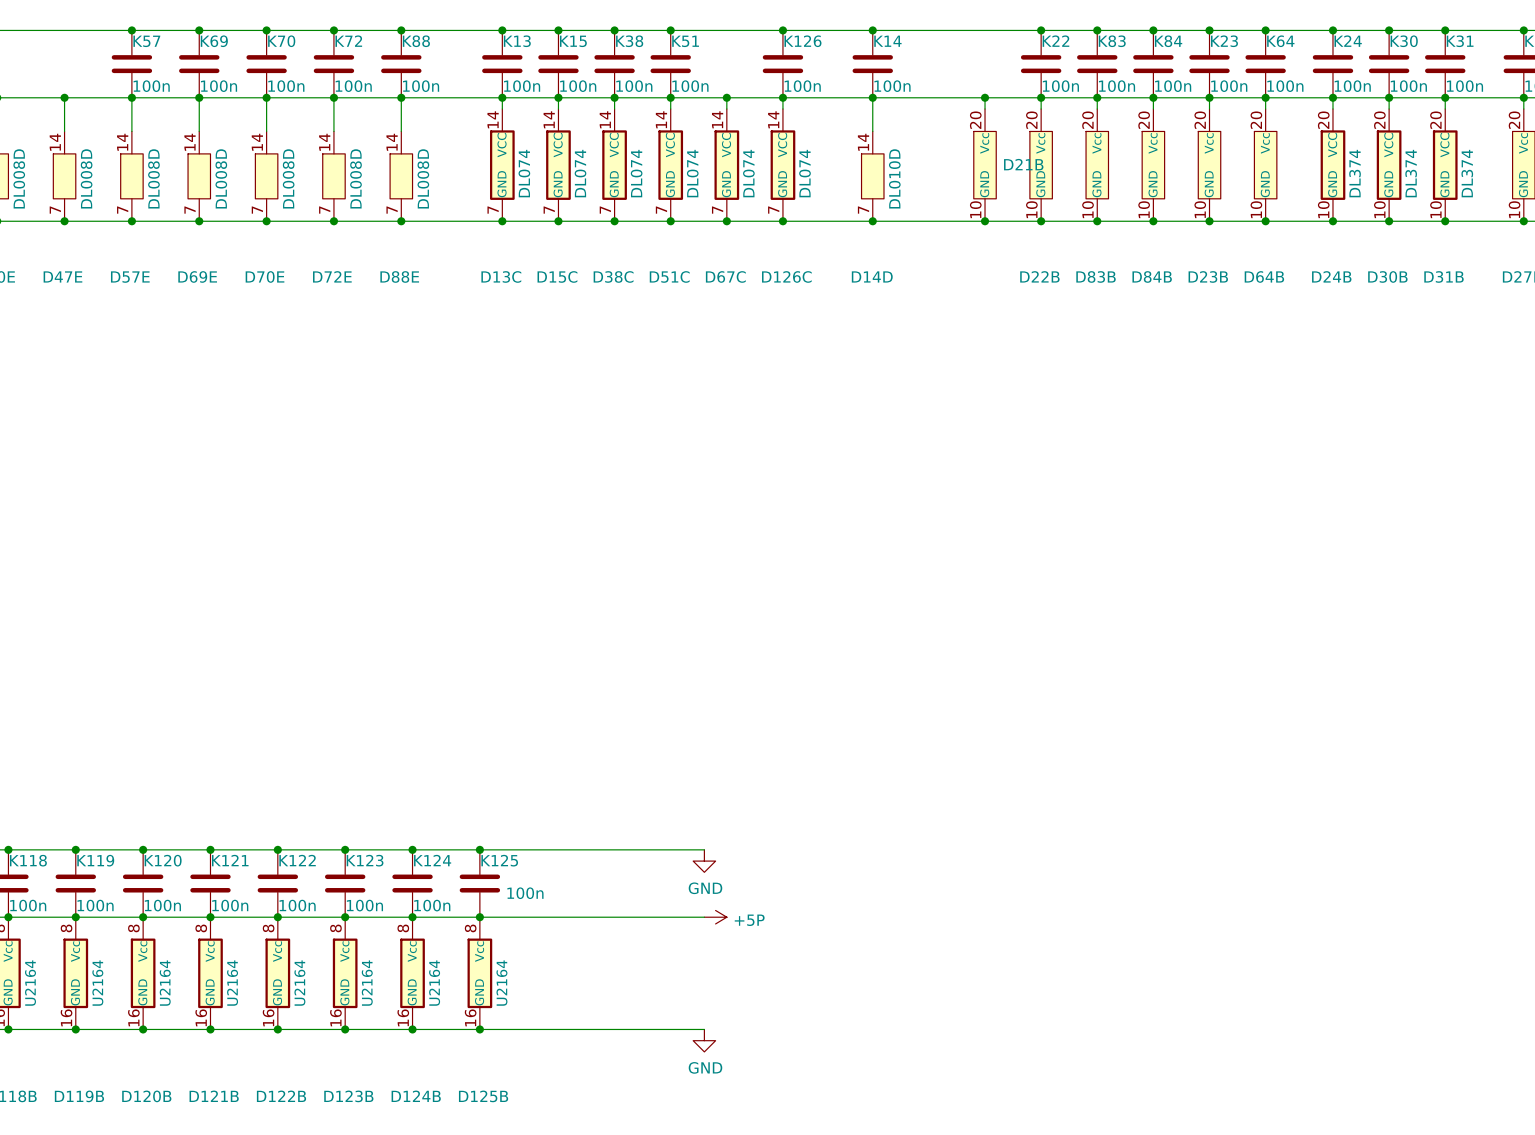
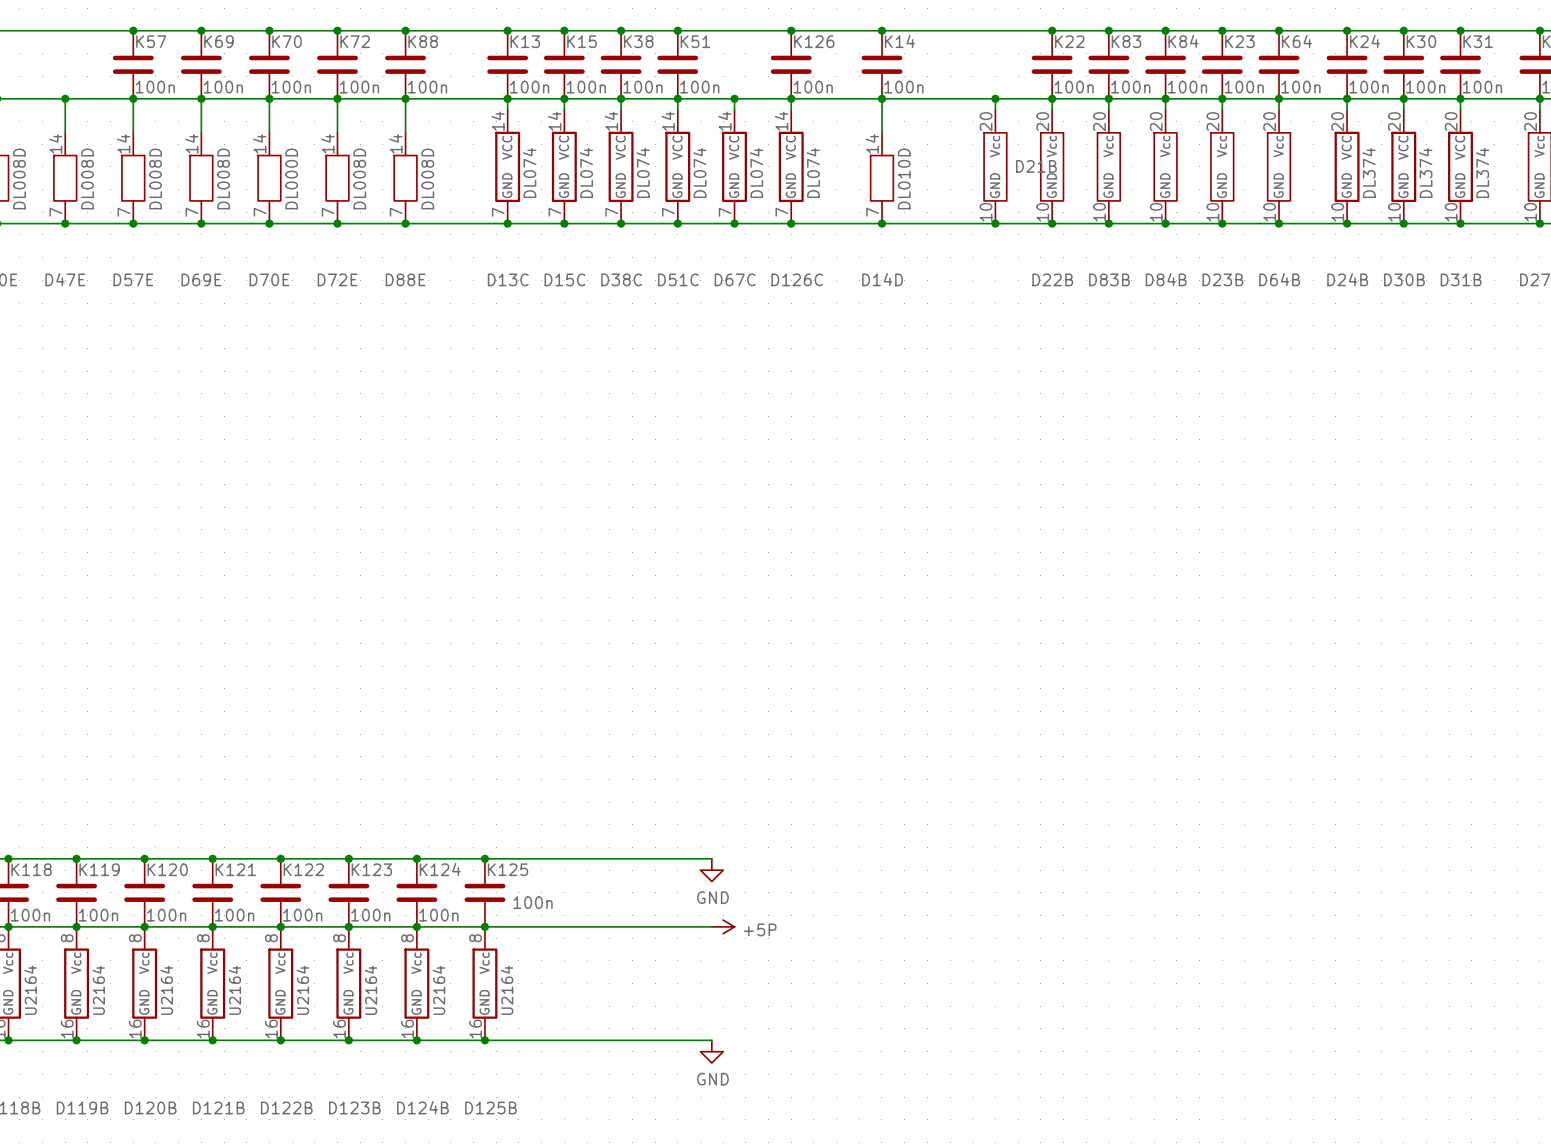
D70E value: DL008D (288, 178) -> DL000D (291, 178)

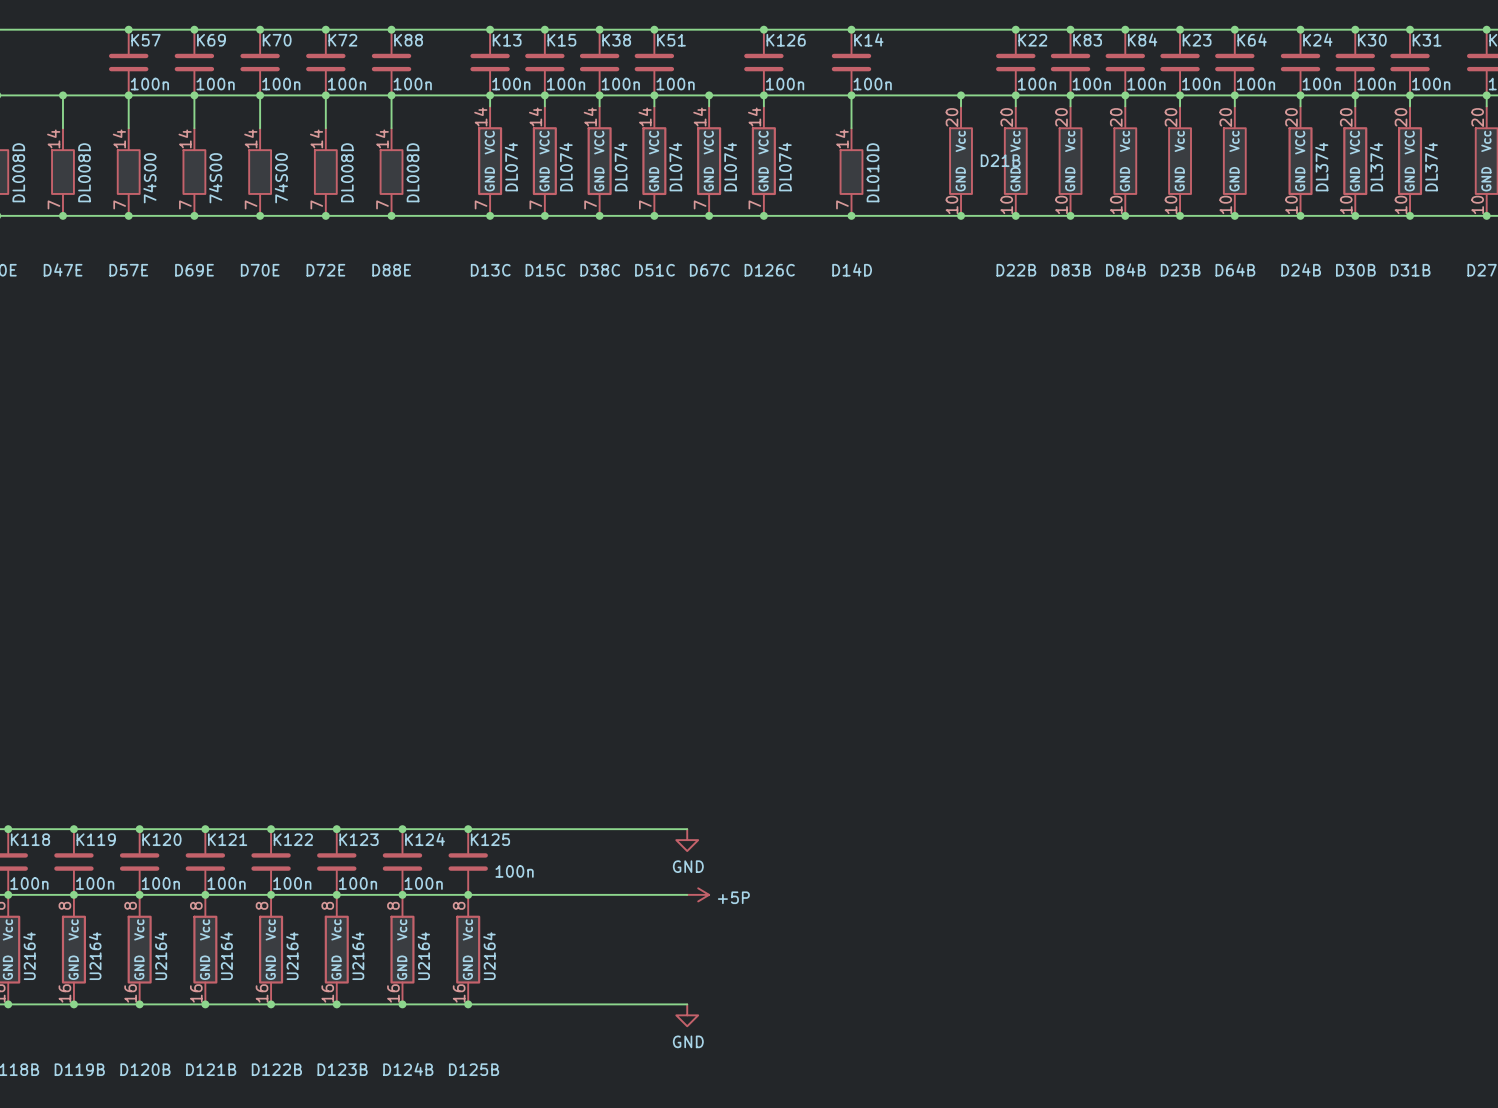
D57E value: DL008D (155, 178) -> 74S00 (149, 178)
D69E value: DL008D (223, 178) -> 74S00 (215, 178)
D70E value: DL000D (291, 178) -> 74S00 (281, 178)

